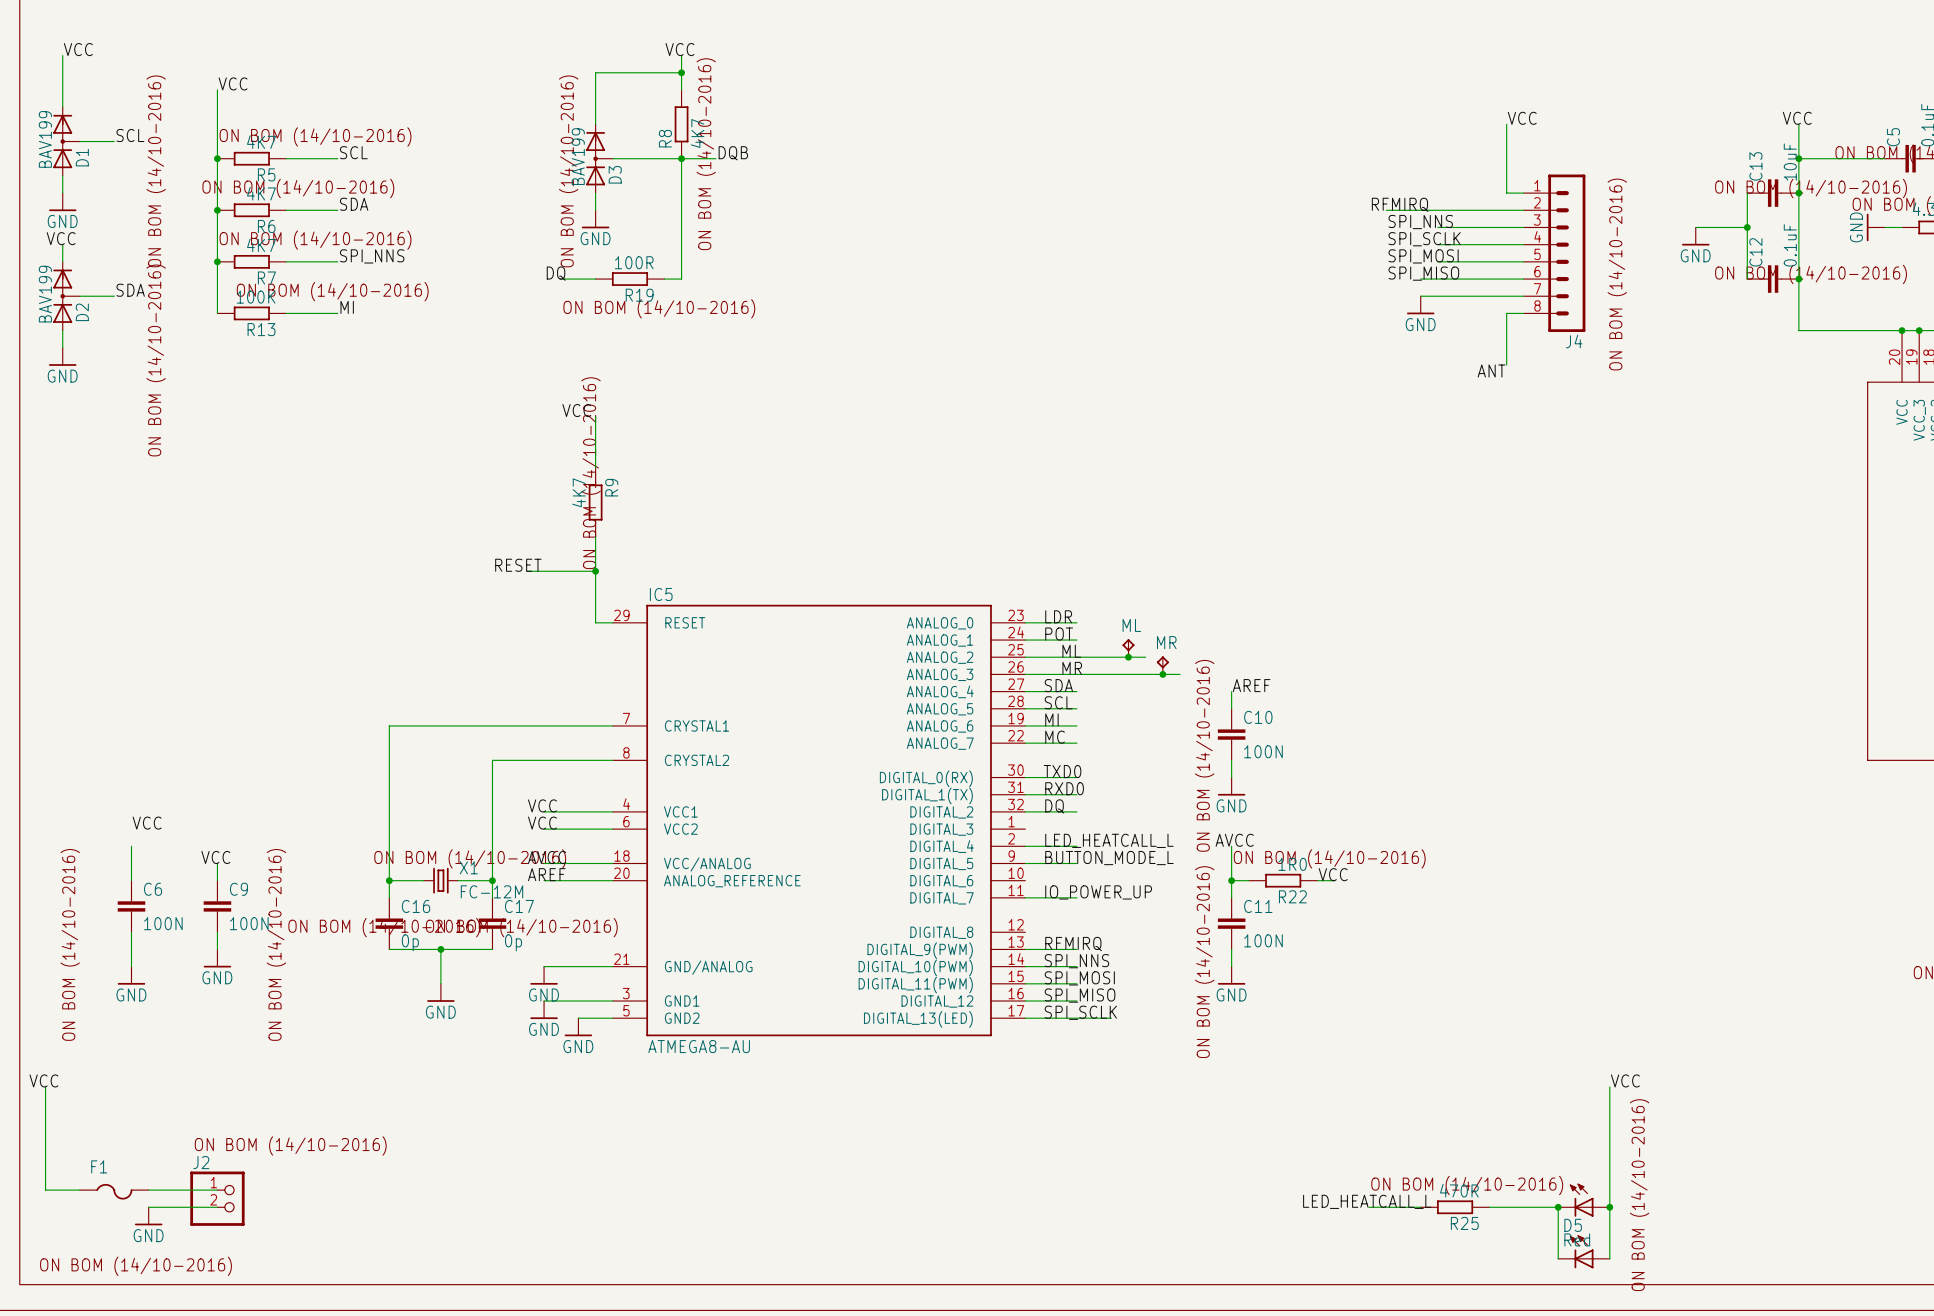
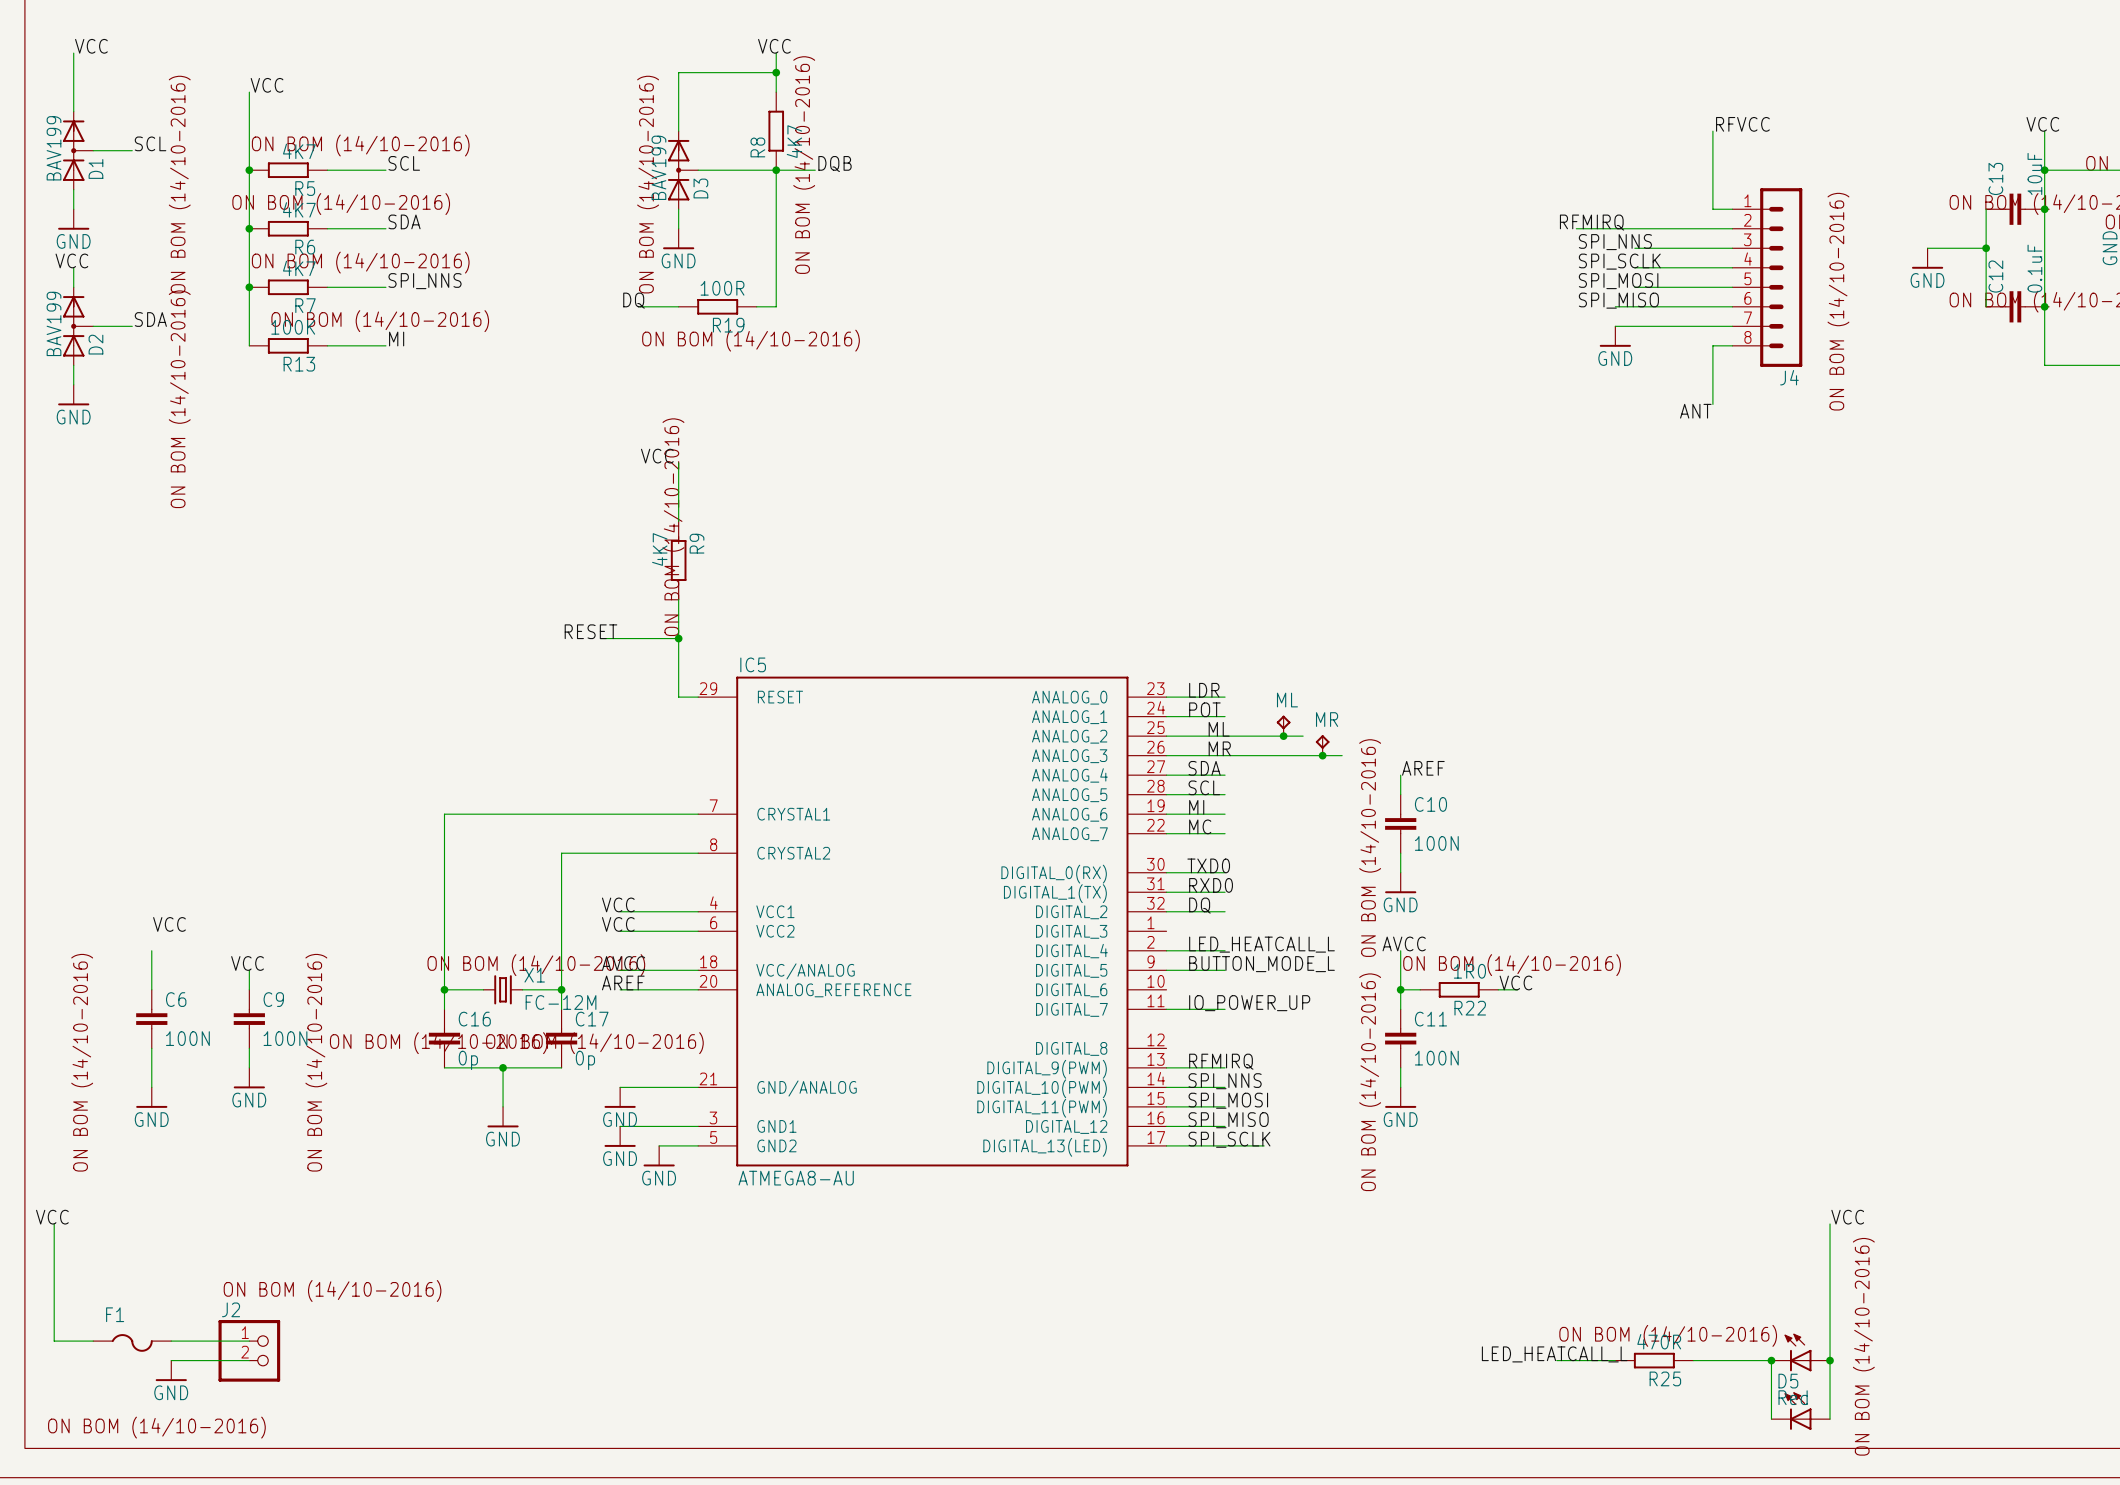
label: VCC (1522, 118) -> RFVCC (1742, 124)

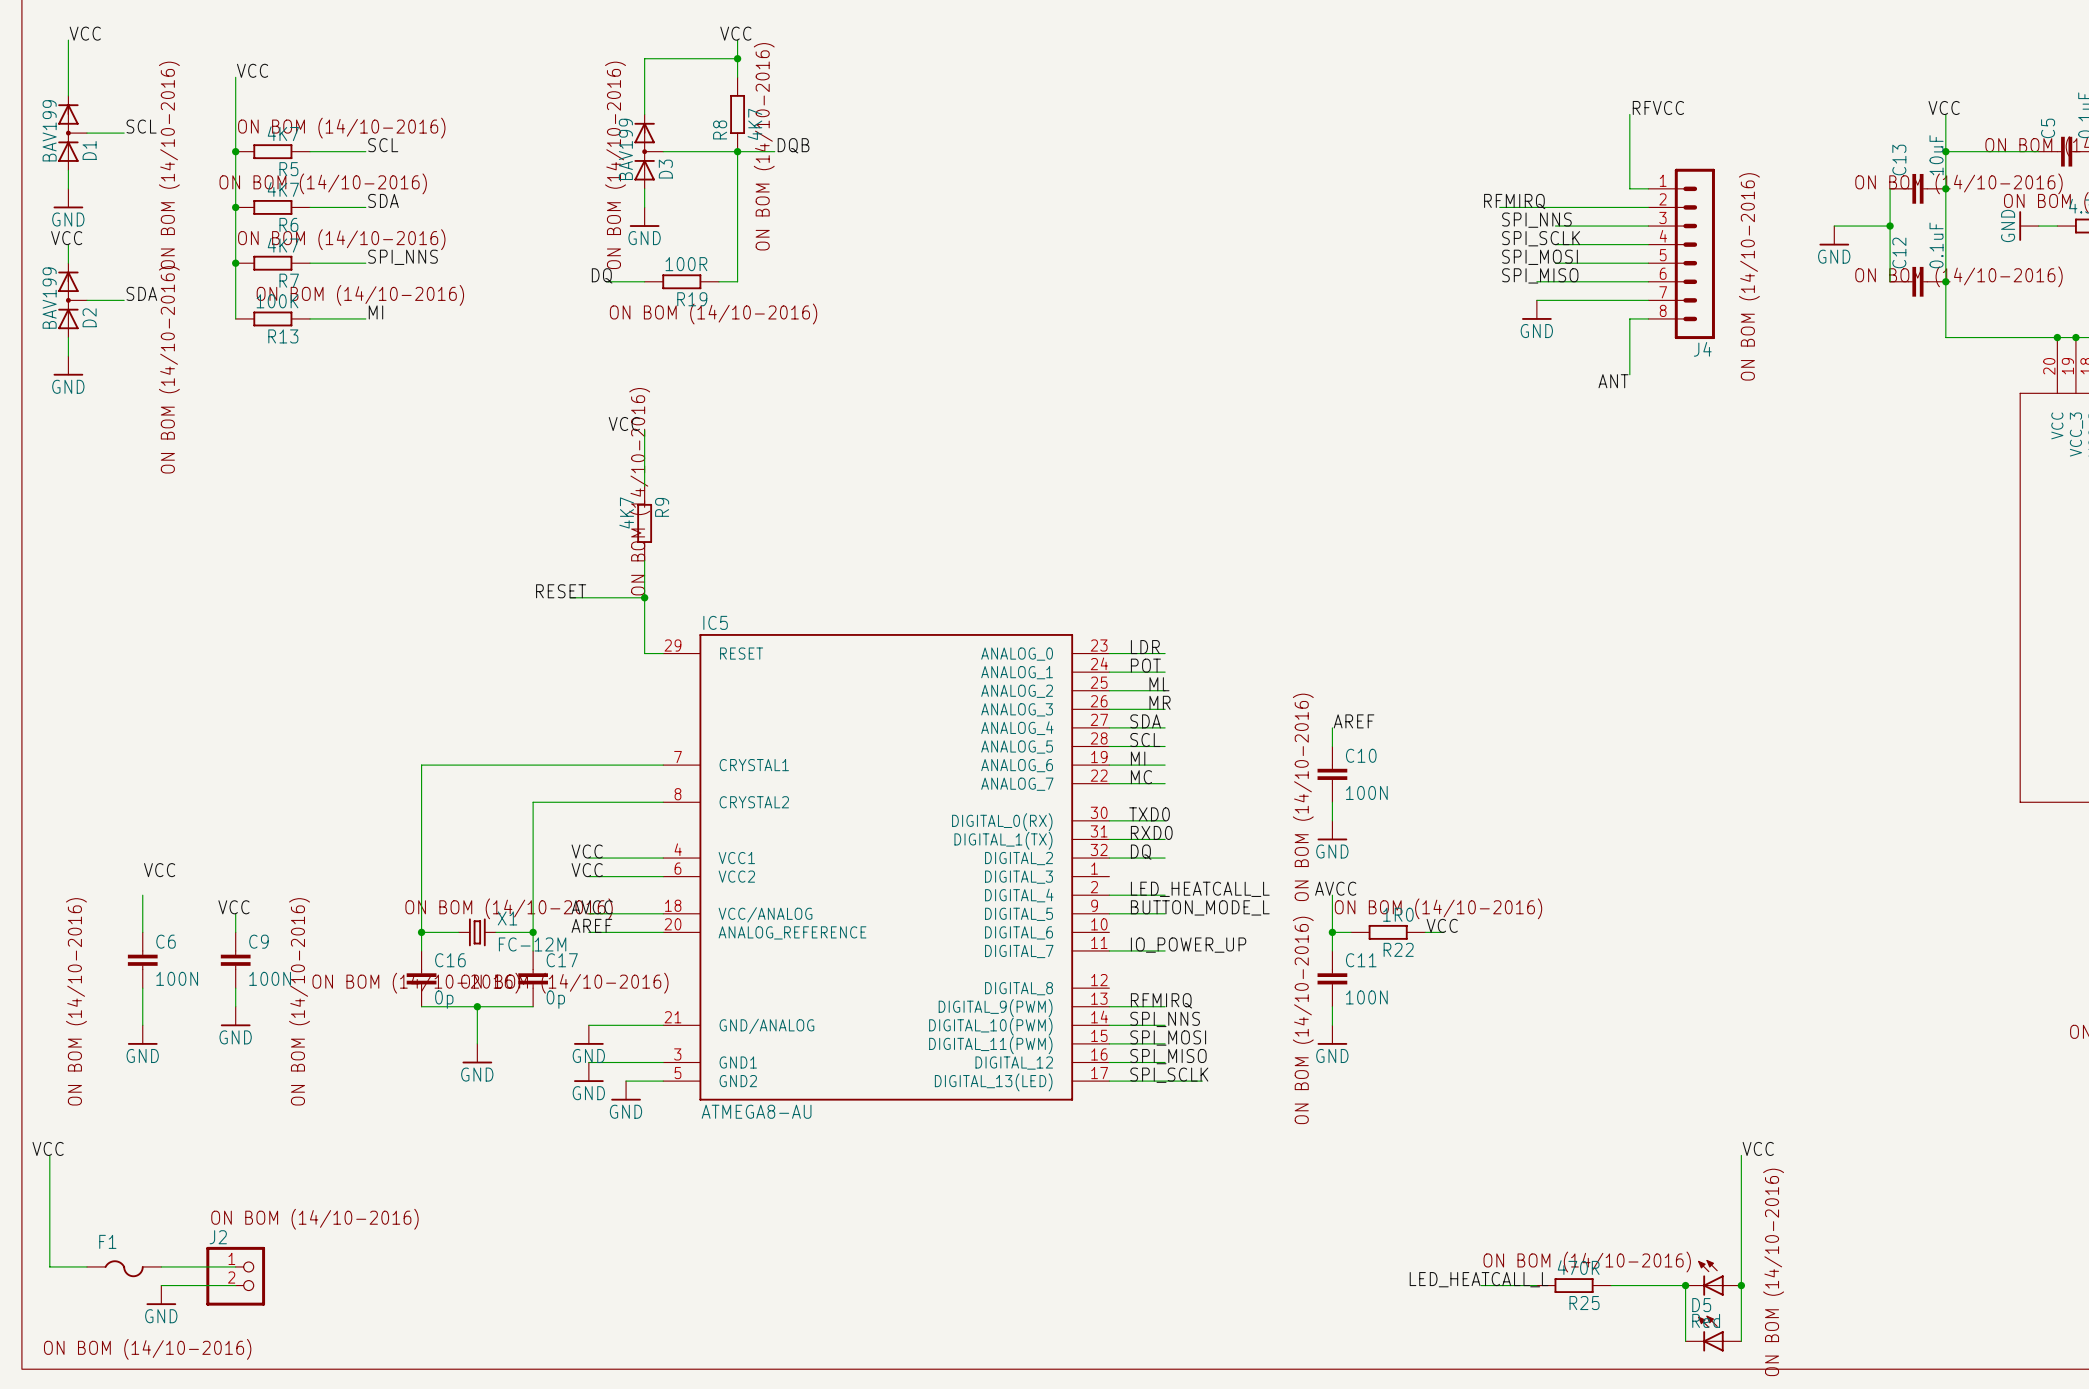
ML: (1283, 725) -> none
wire: (1225, 736) (1303, 736) -> none
junction: (1283, 736) -> none
MR: (1322, 745) -> none
wire: (1225, 755) (1342, 755) -> none
junction: (1322, 755) -> none

